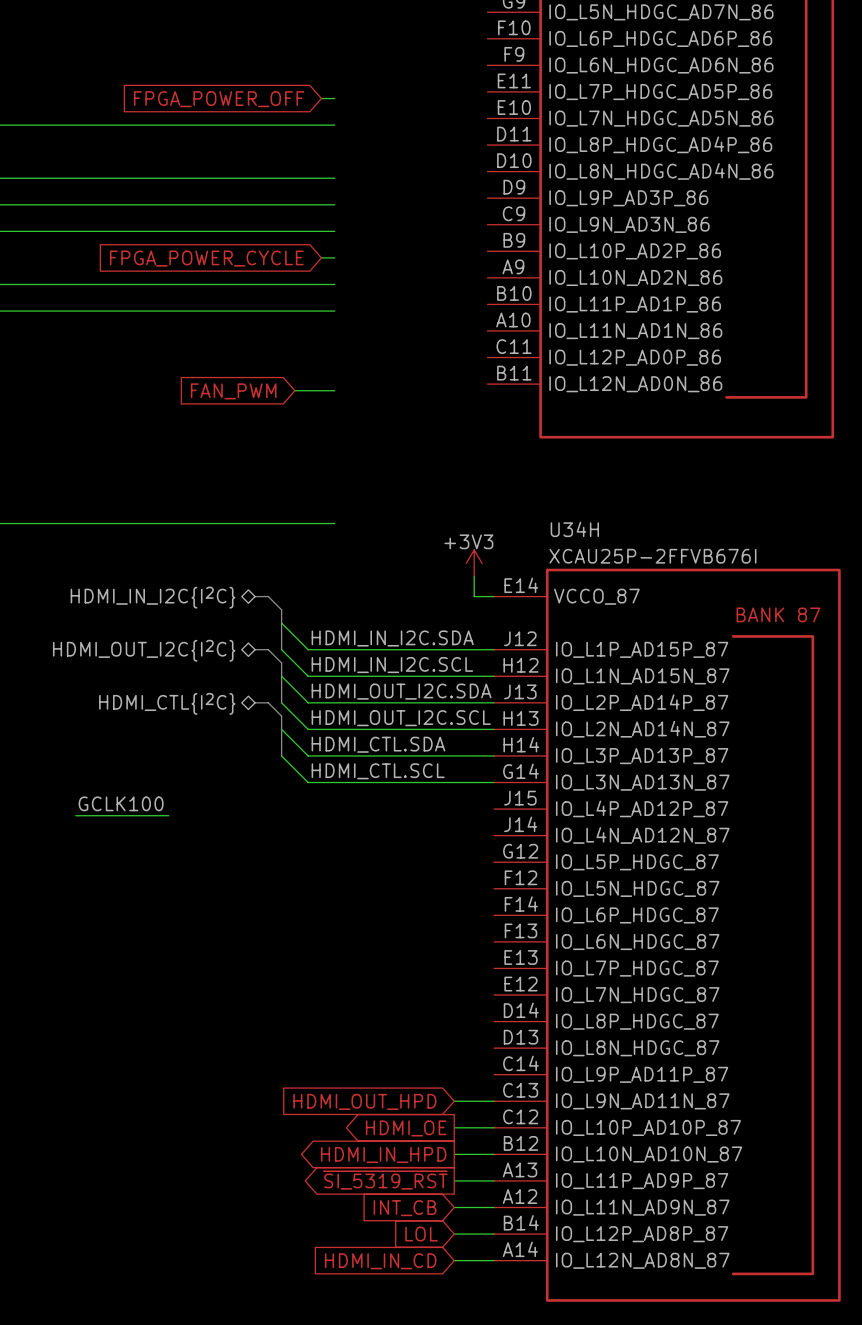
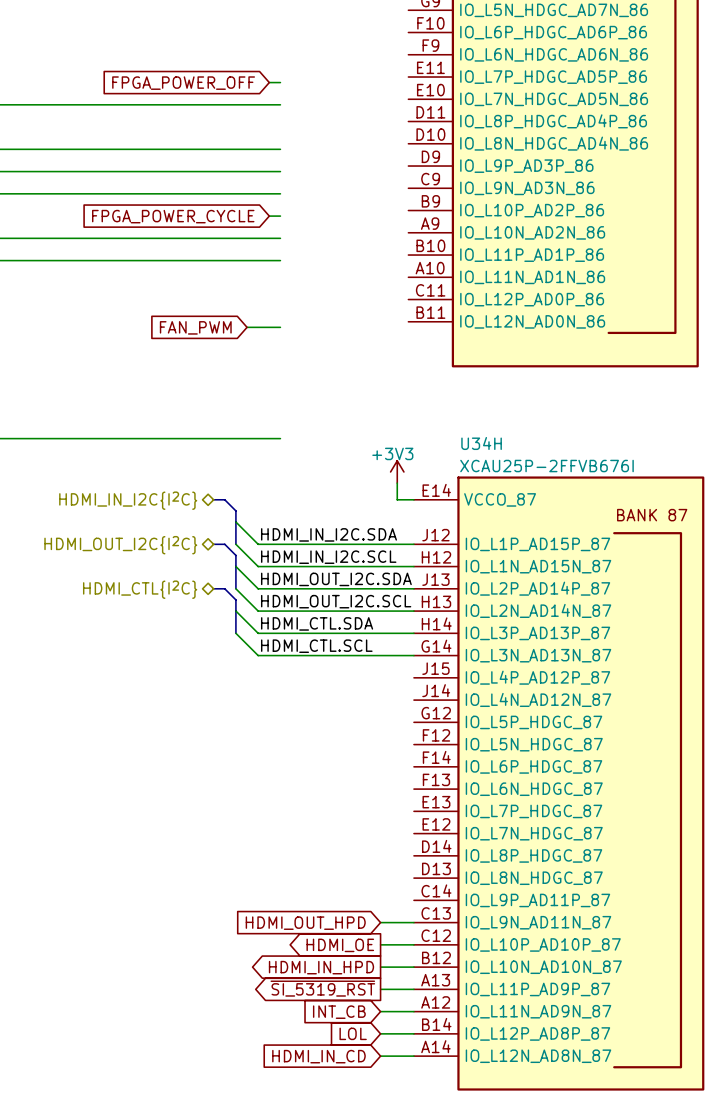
label: GCLK100 (121, 803) -> none
wire: (75, 815) (168, 815) -> none

